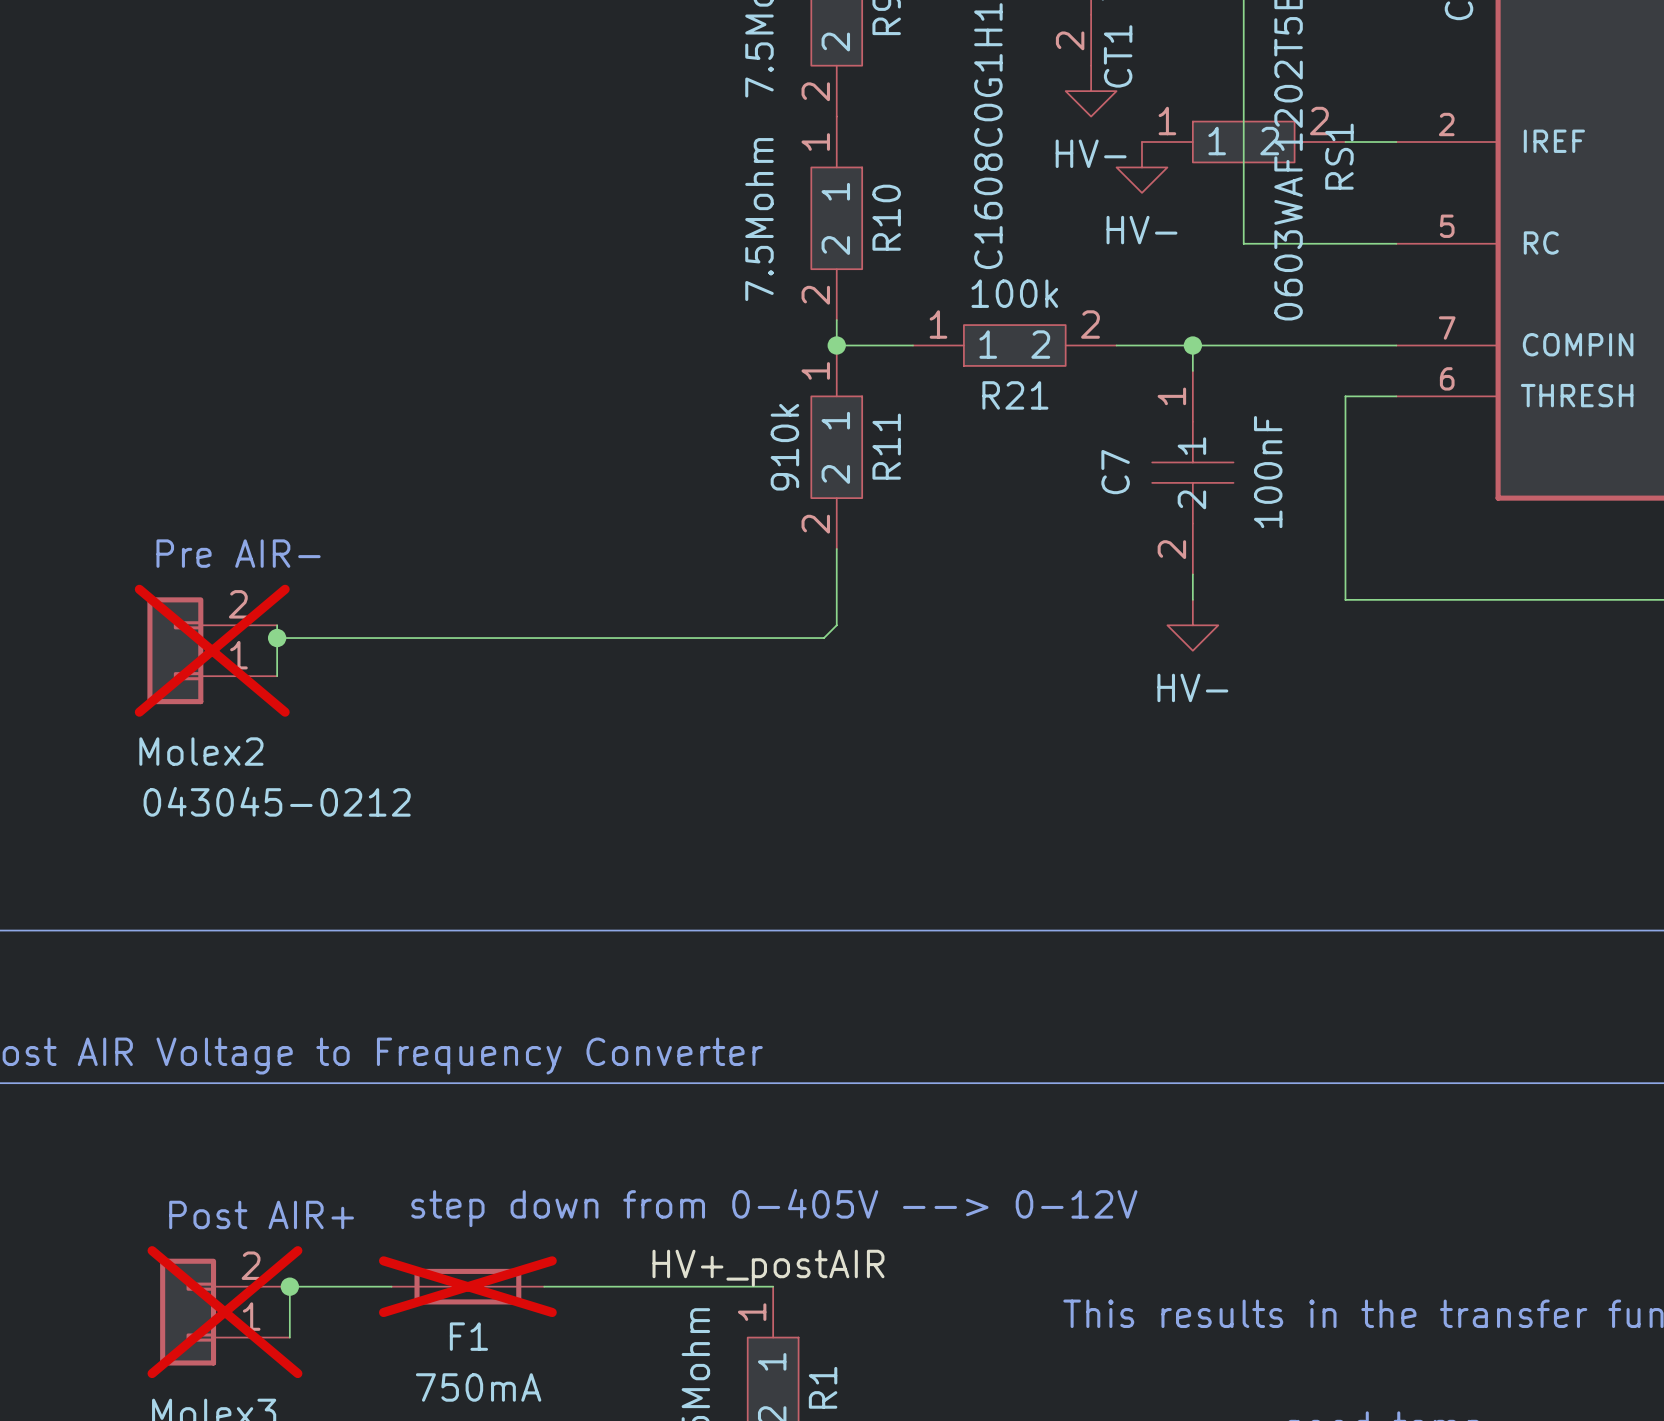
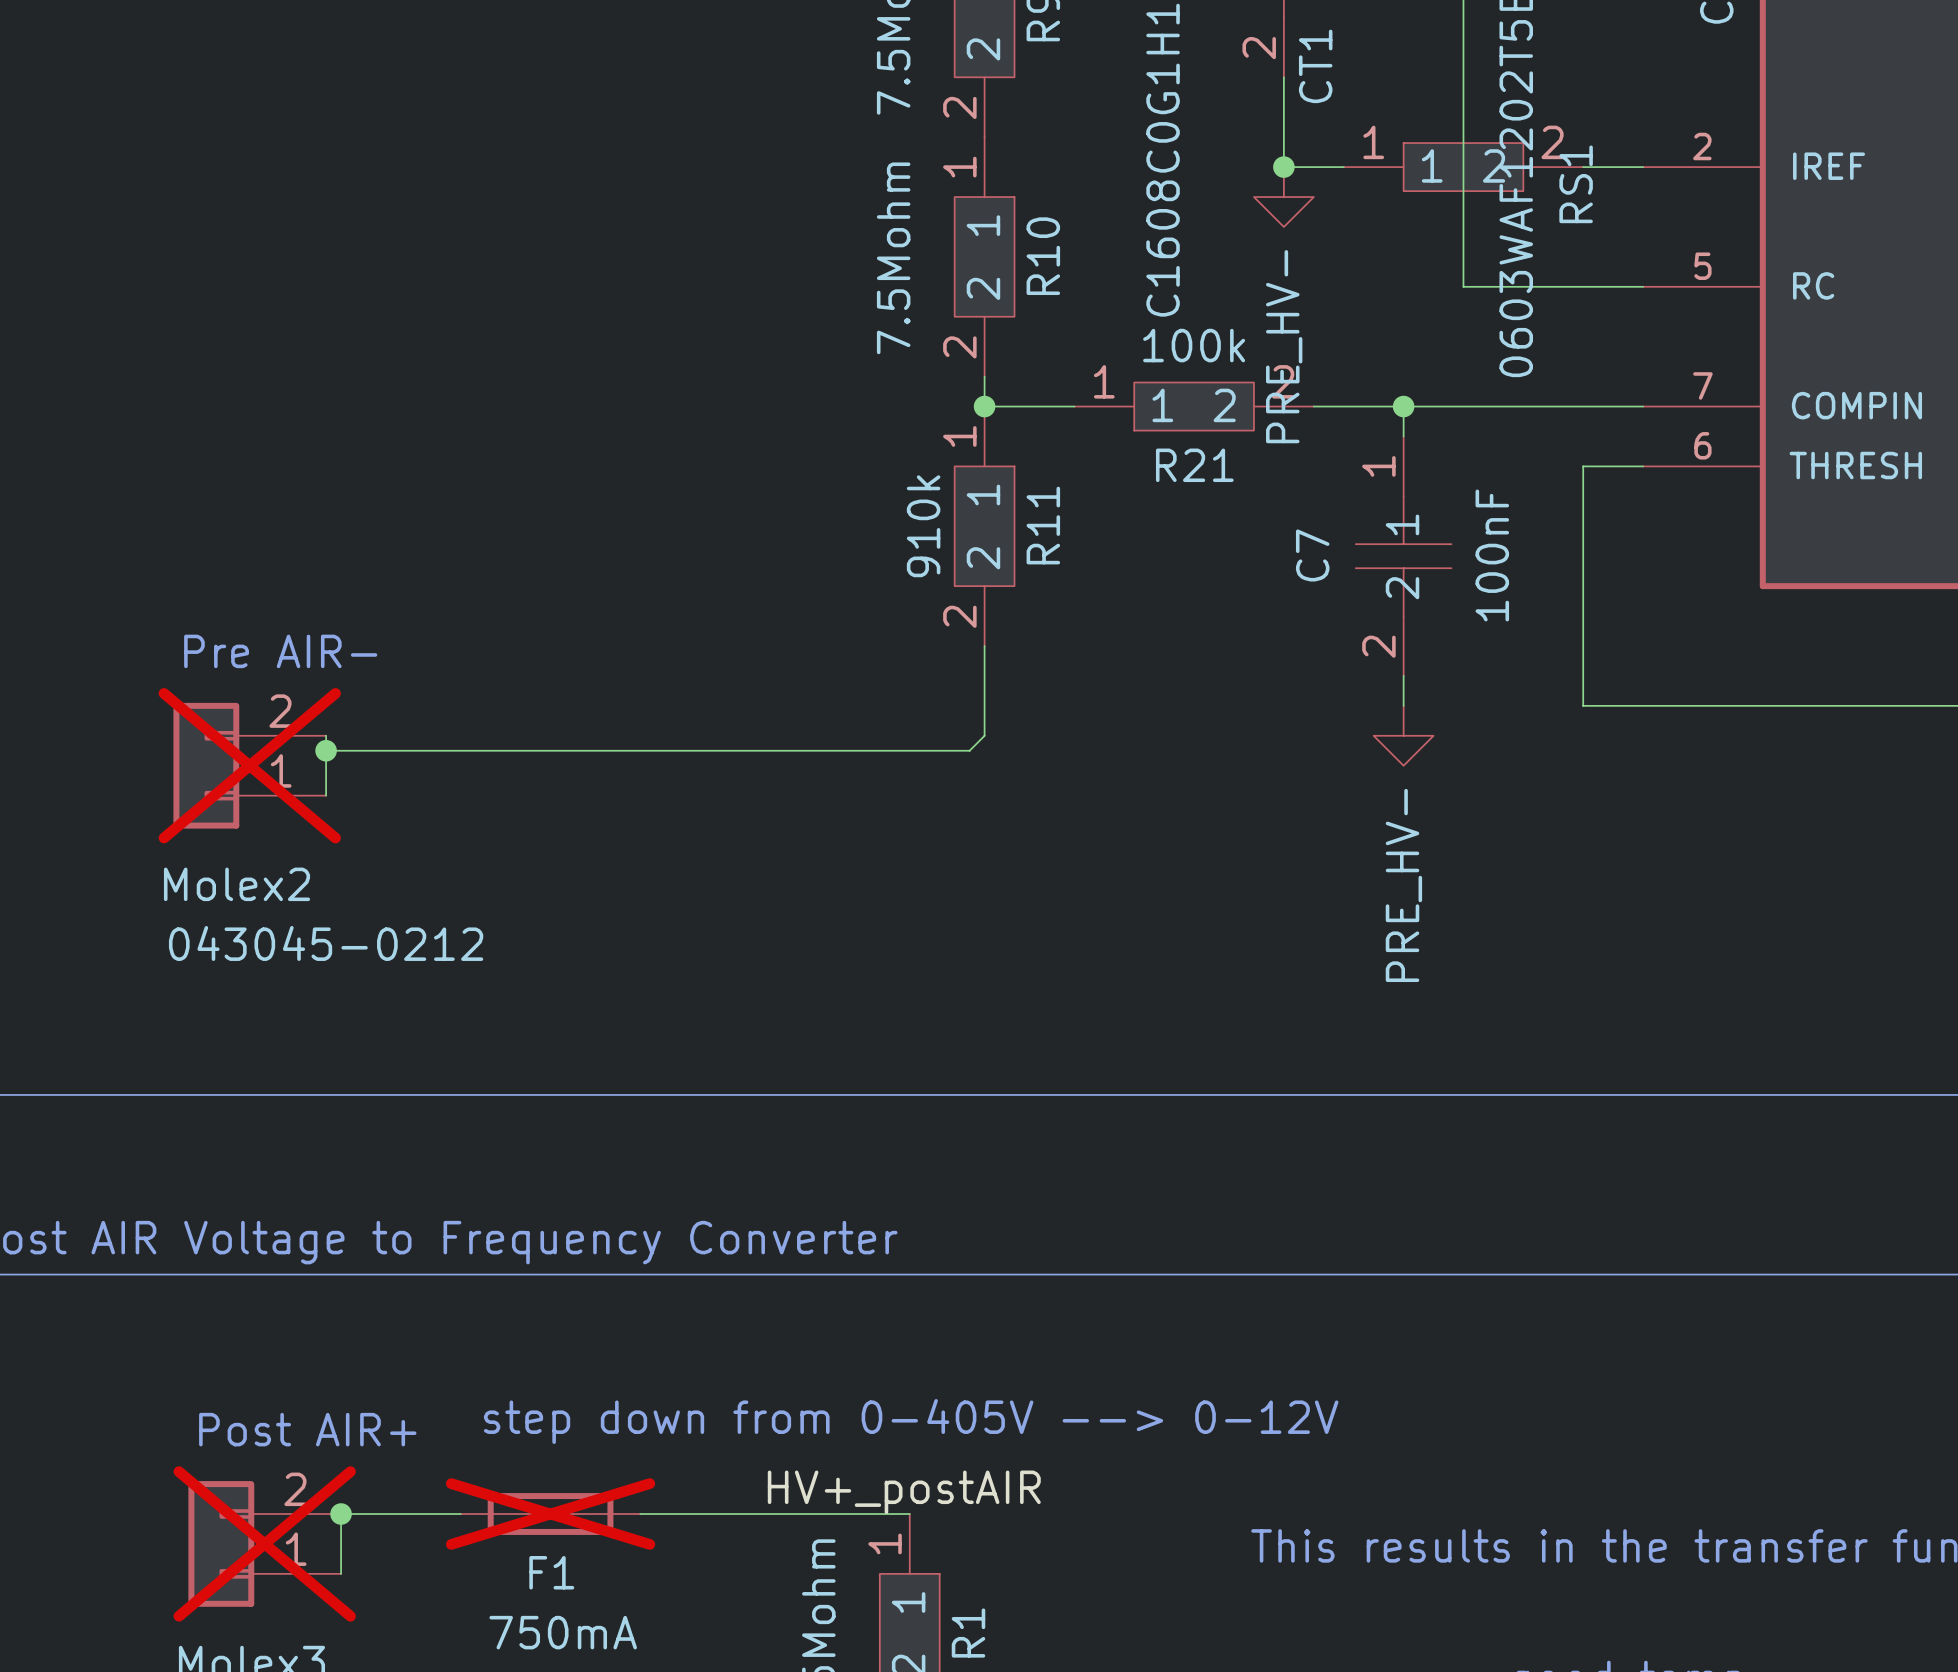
wire: none -> (1283, 77) (1283, 167) (1343, 167)
power symbol: HV- (1091, 91) -> none
junction: none -> (1283, 167)
power symbol: none -> PRE_HV- (1283, 197)
power symbol: HV- (1141, 167) -> none
power symbol: HV- (1192, 625) -> PRE_HV- (1403, 735)

